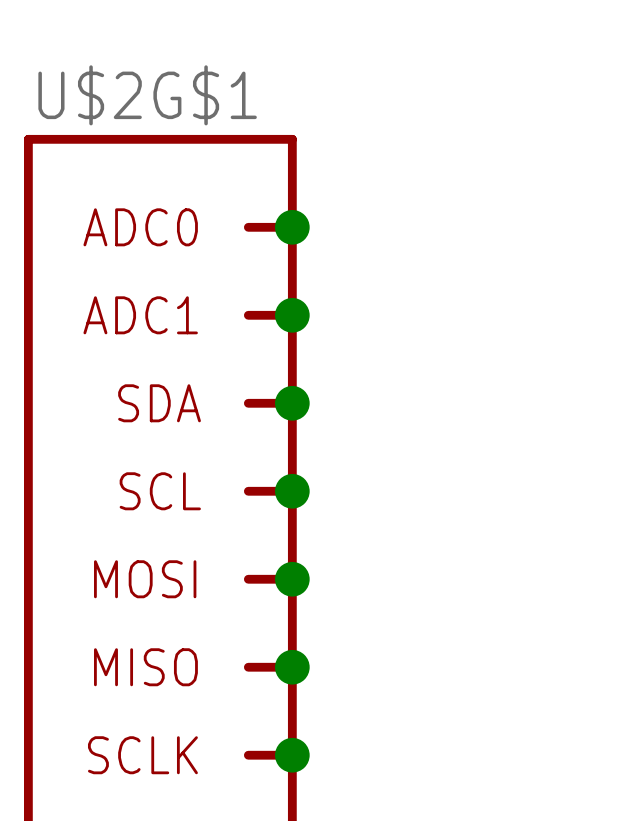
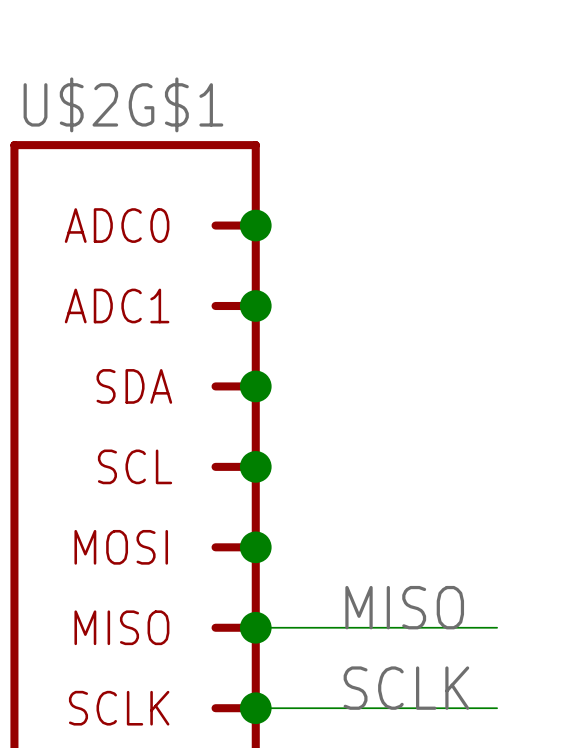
label: none -> MISO (404, 607)
wire: none -> (255, 627) (497, 627)
label: none -> SCLK (406, 688)
wire: none -> (255, 708) (497, 708)

